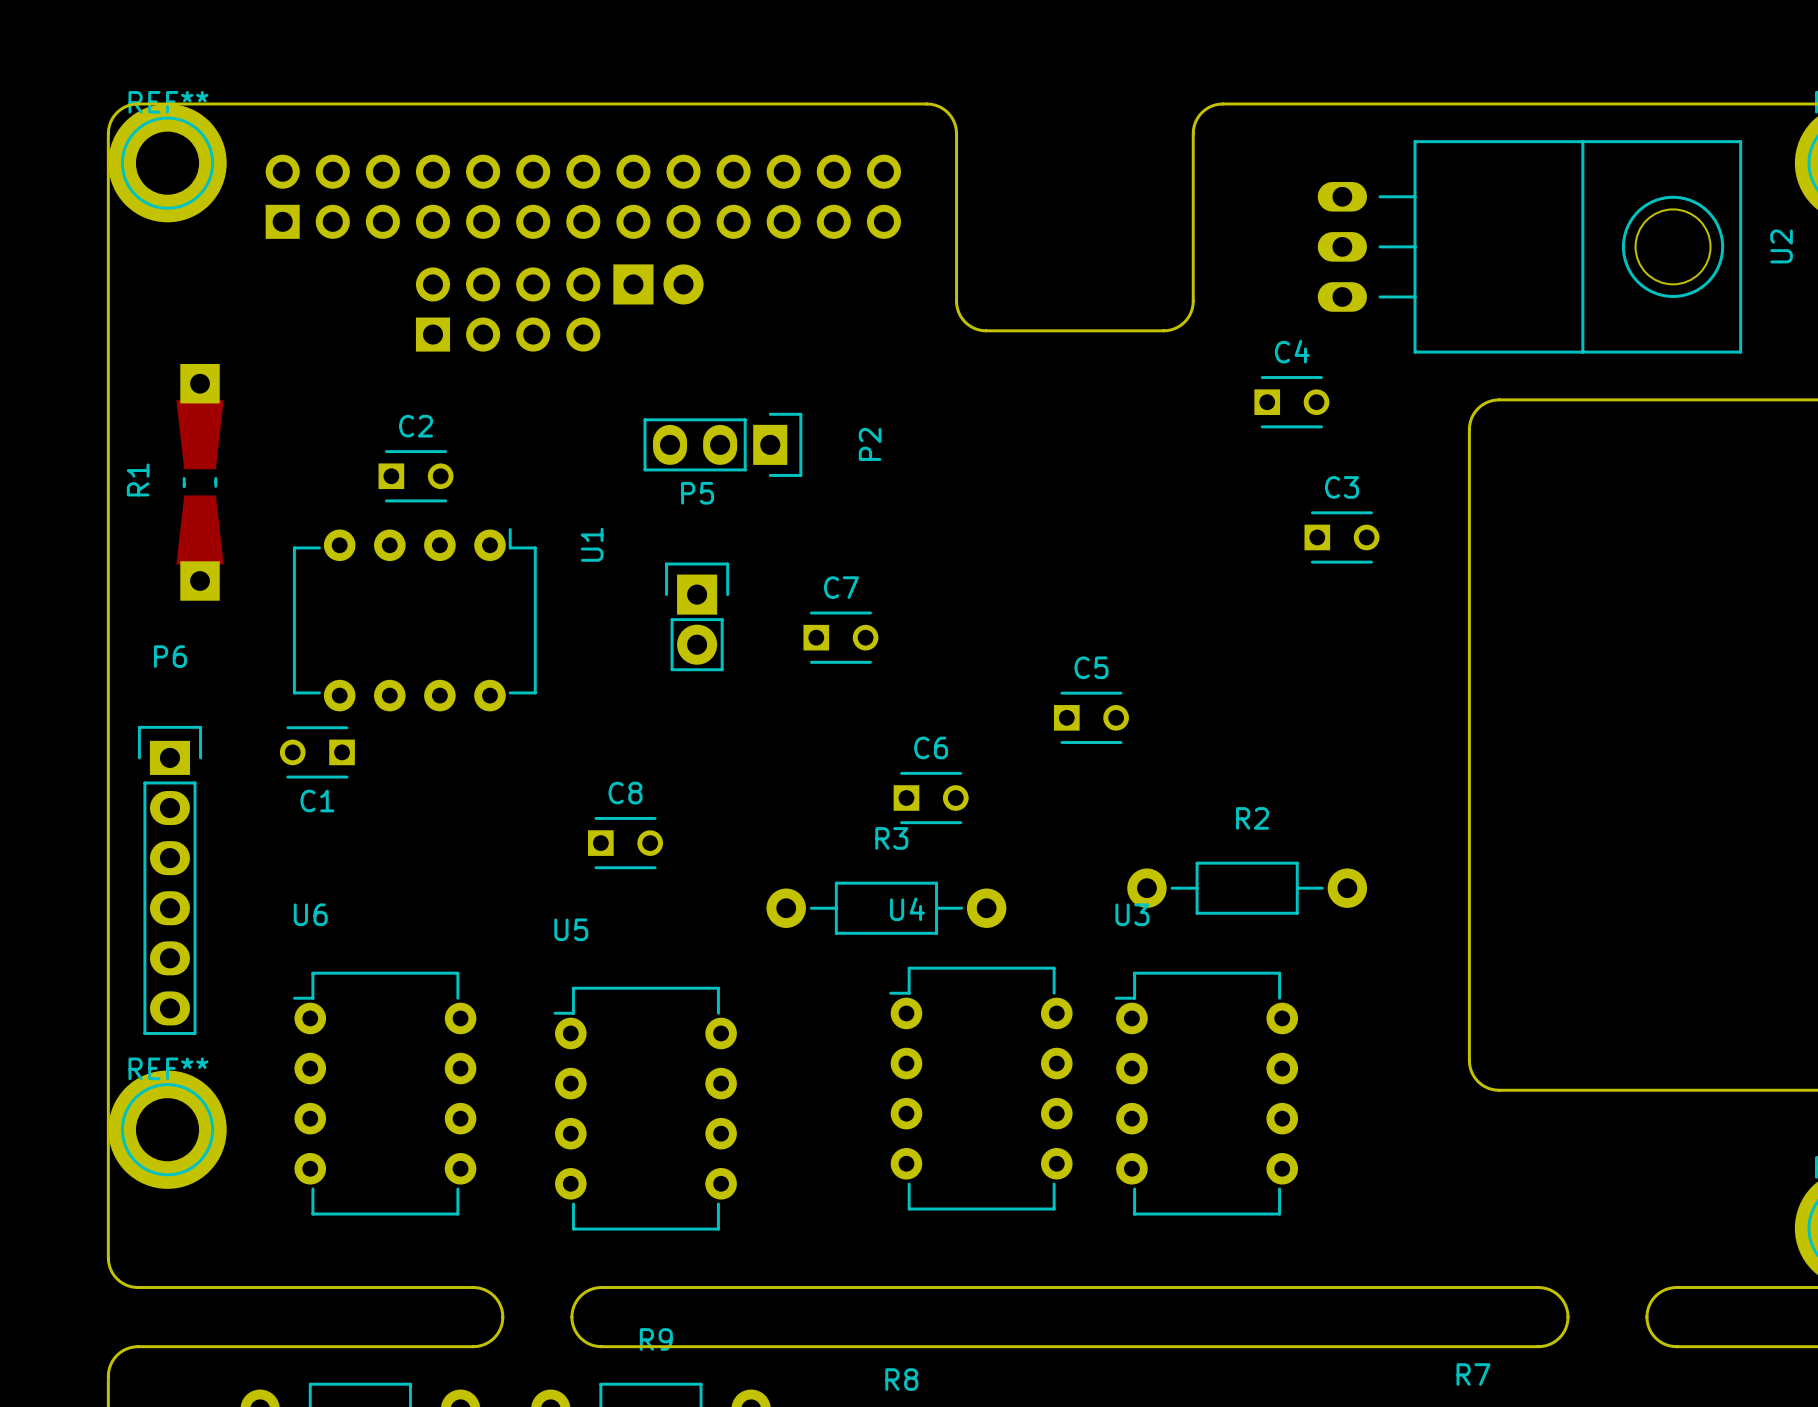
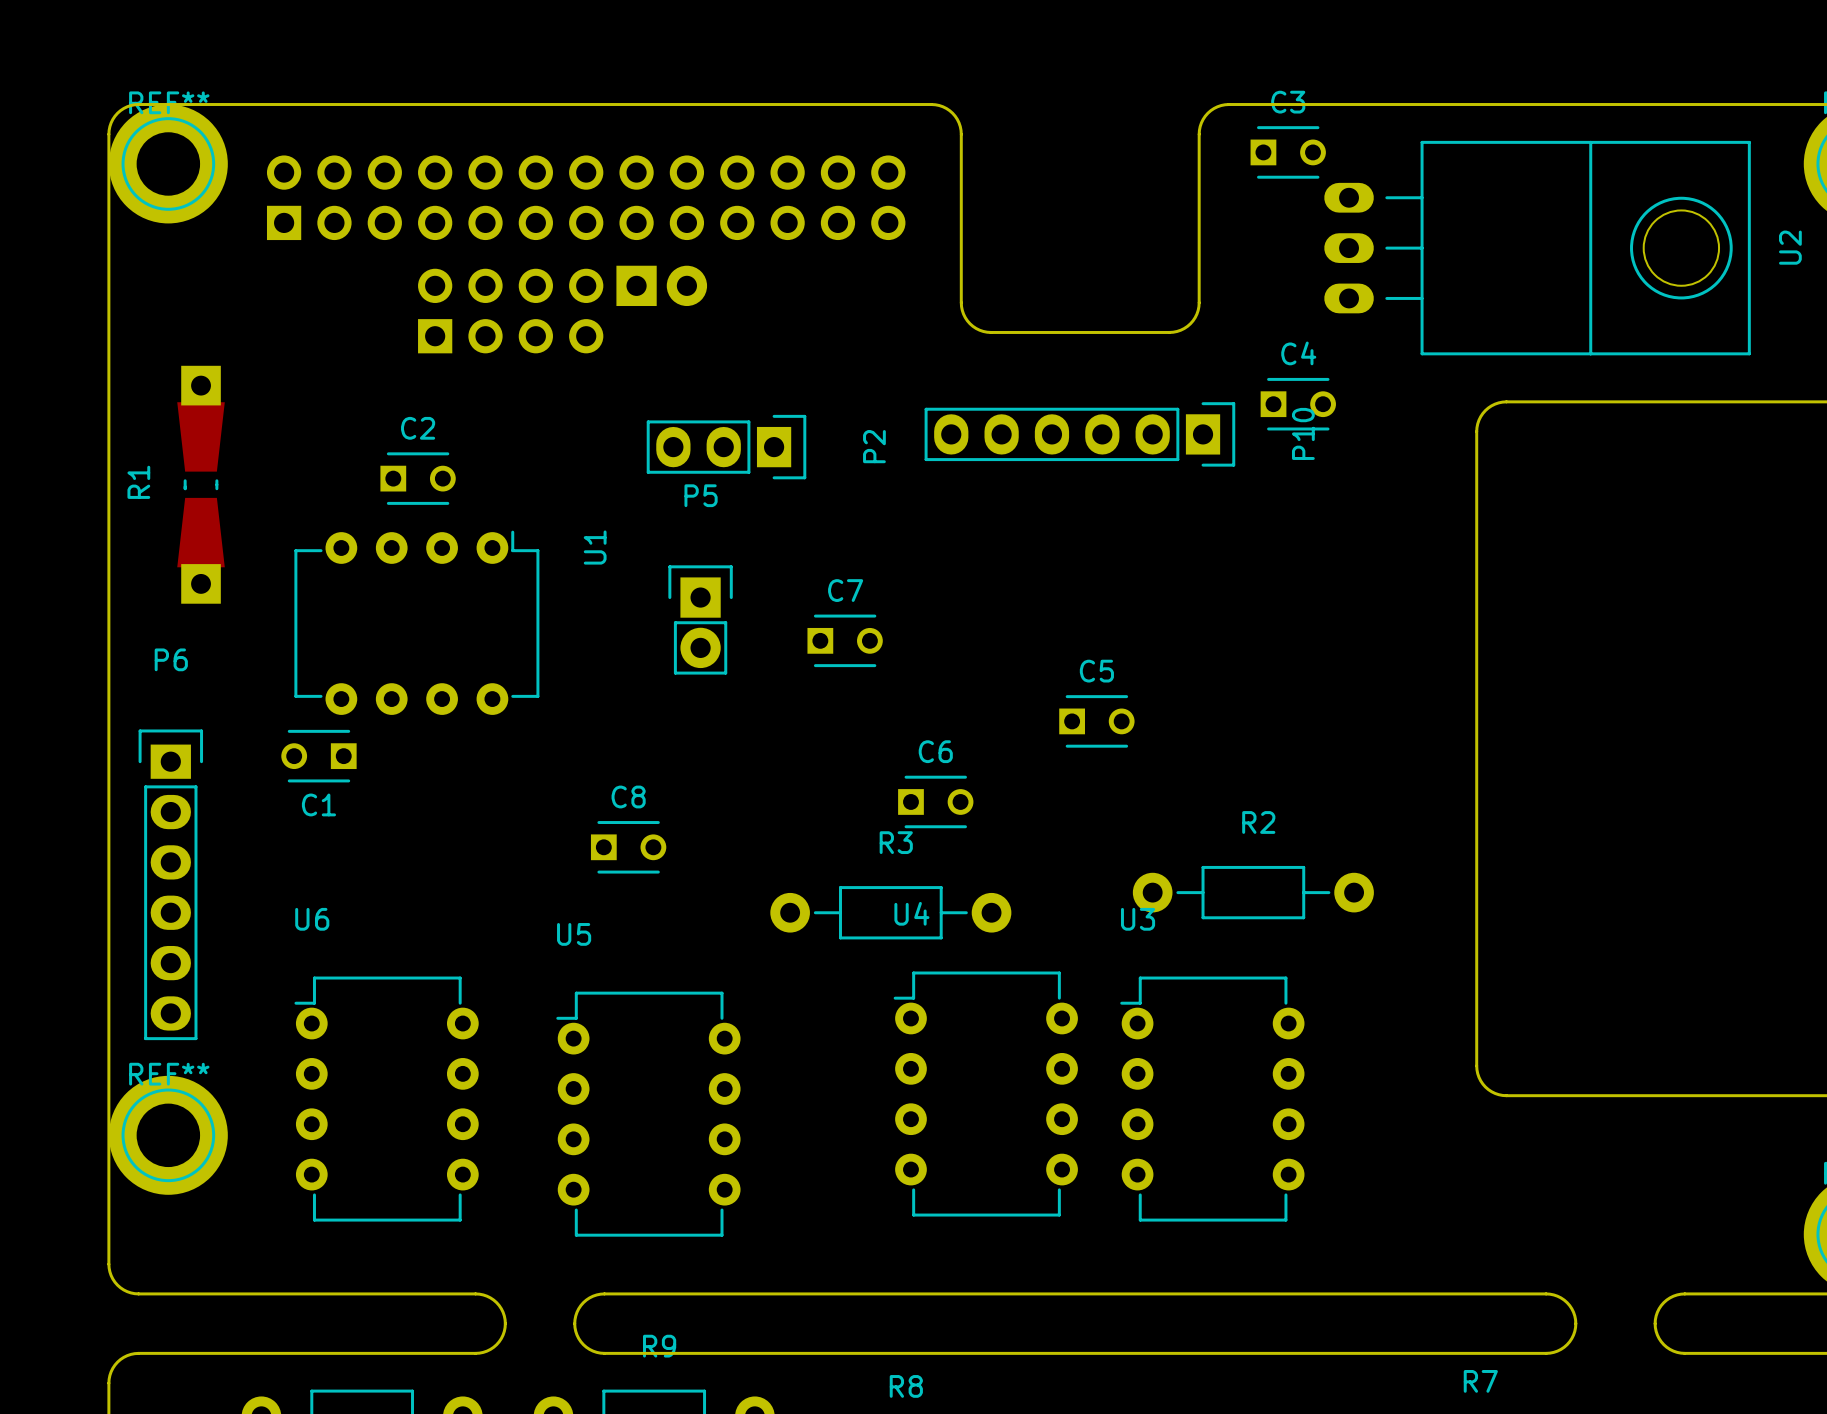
P10: none -> (1079, 434)
C3 position: (1341, 537) -> (1288, 152)

